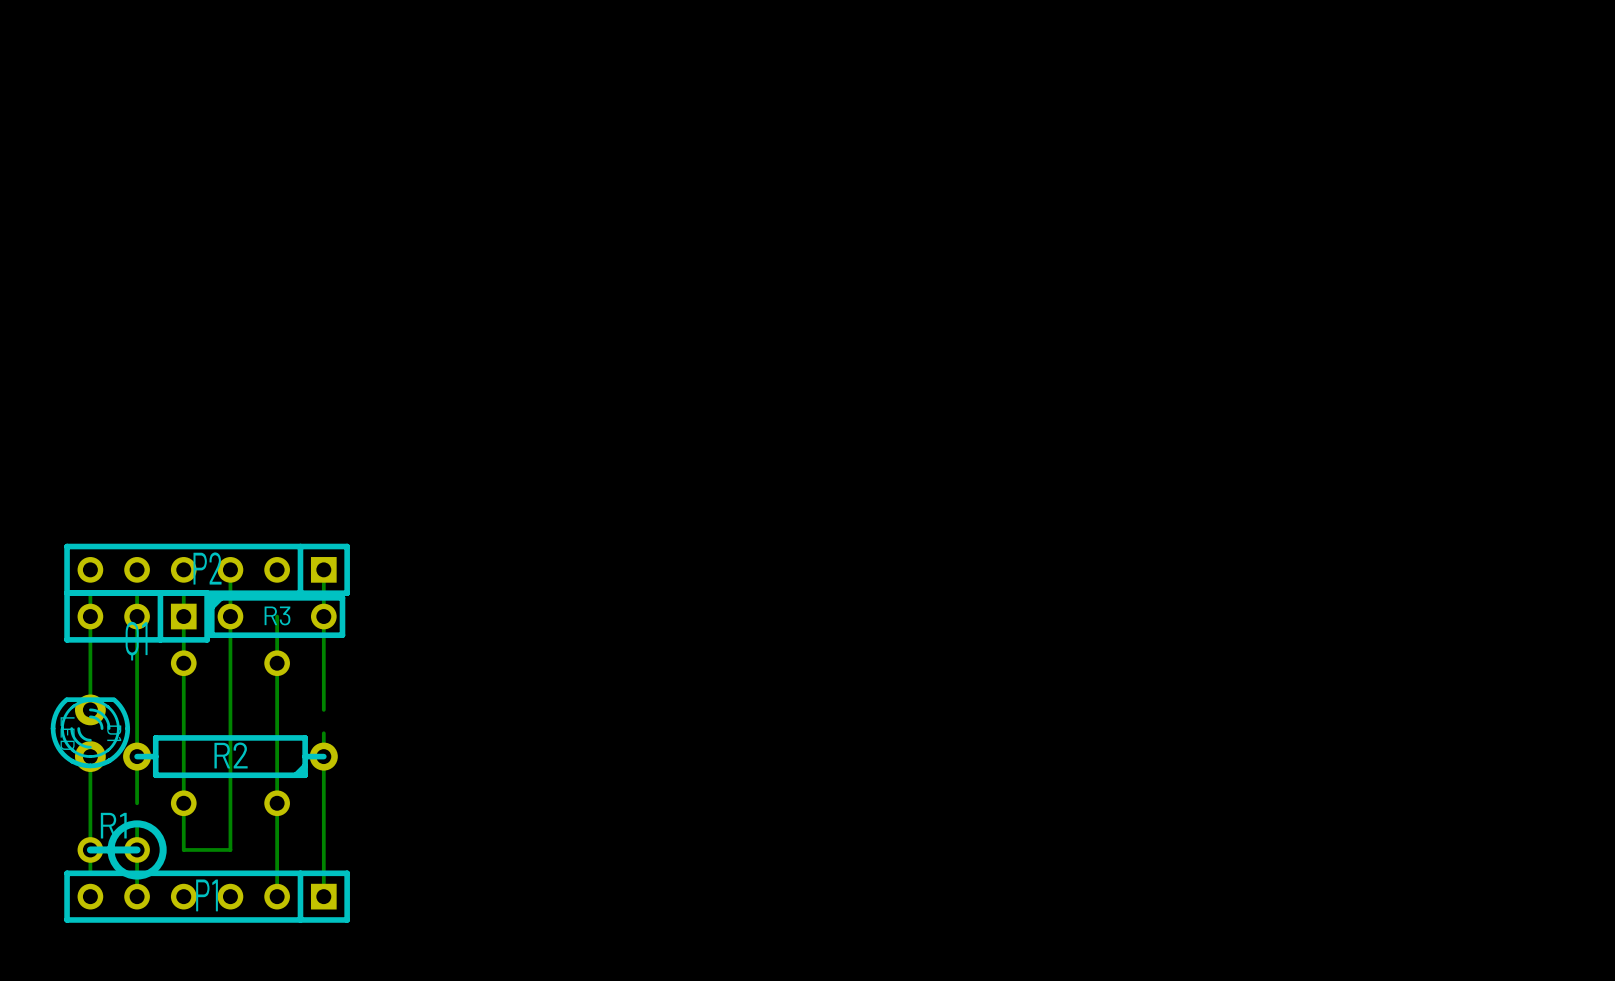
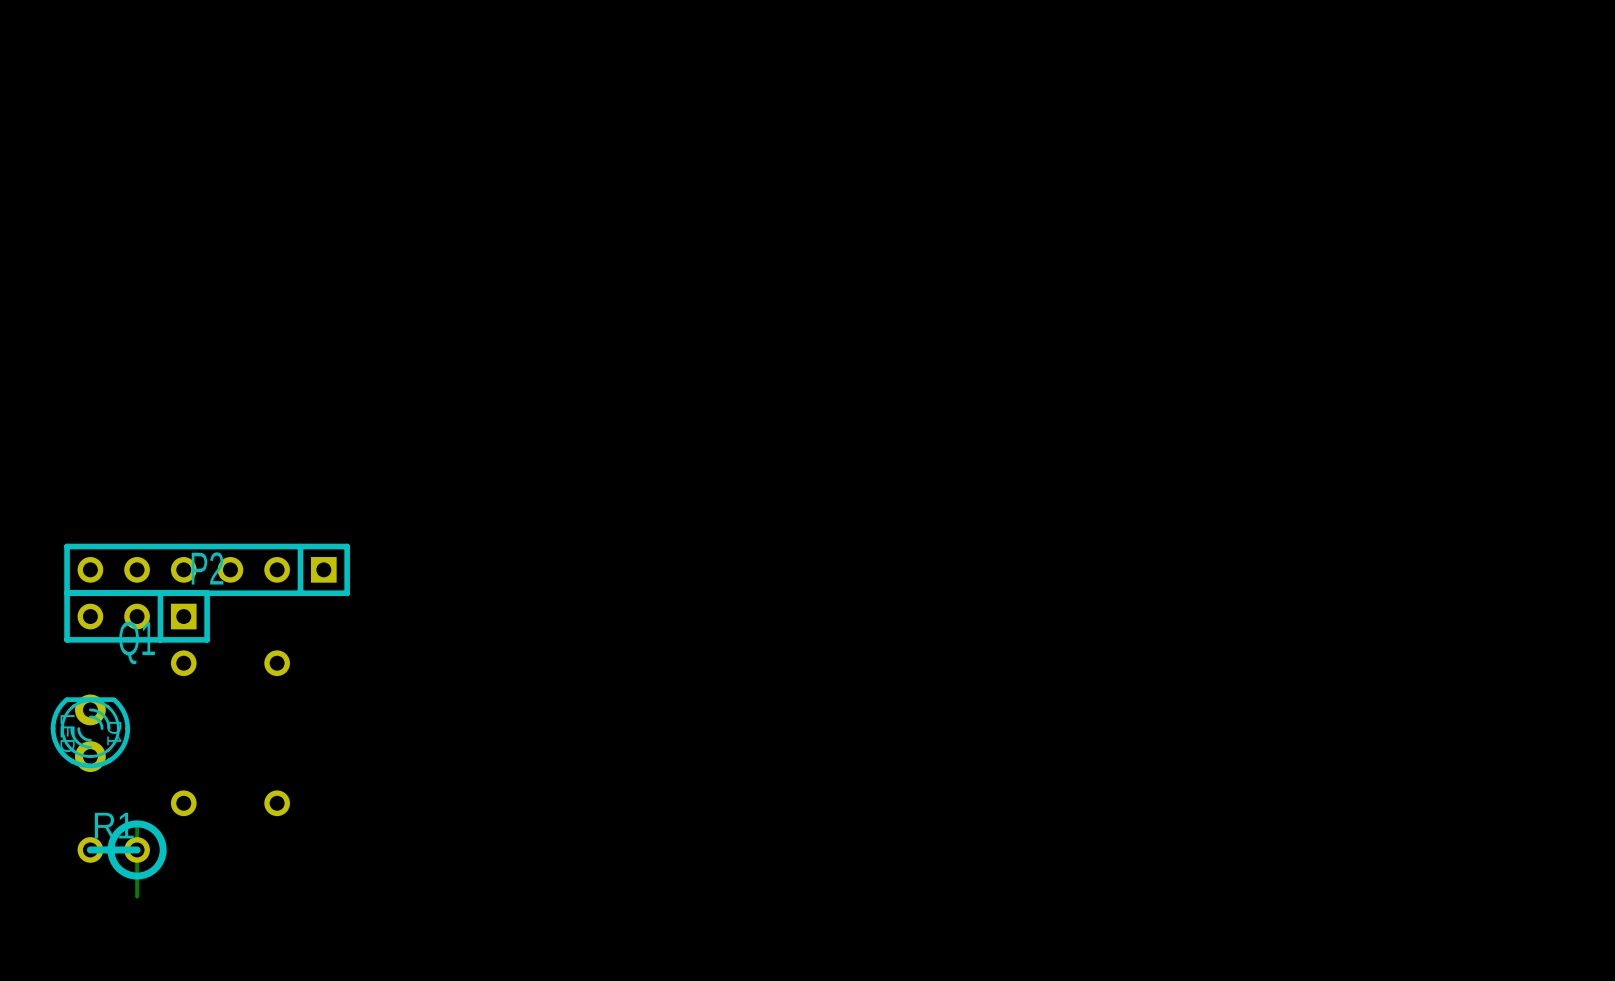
bottom track: (230, 569) (230, 849) (183, 849) (183, 593) -> none
bottom track: (323, 569) (323, 709) -> none
bottom track: (90, 593) (90, 709) -> none
bottom track: (137, 593) (137, 803) -> none
bottom track: (277, 616) (277, 896) -> none
R3: (277, 616) -> none
bottom track: (323, 733) (323, 896) -> none
bottom track: (90, 756) (90, 873) -> none
R2: (230, 756) -> none
P1: (207, 896) -> none

